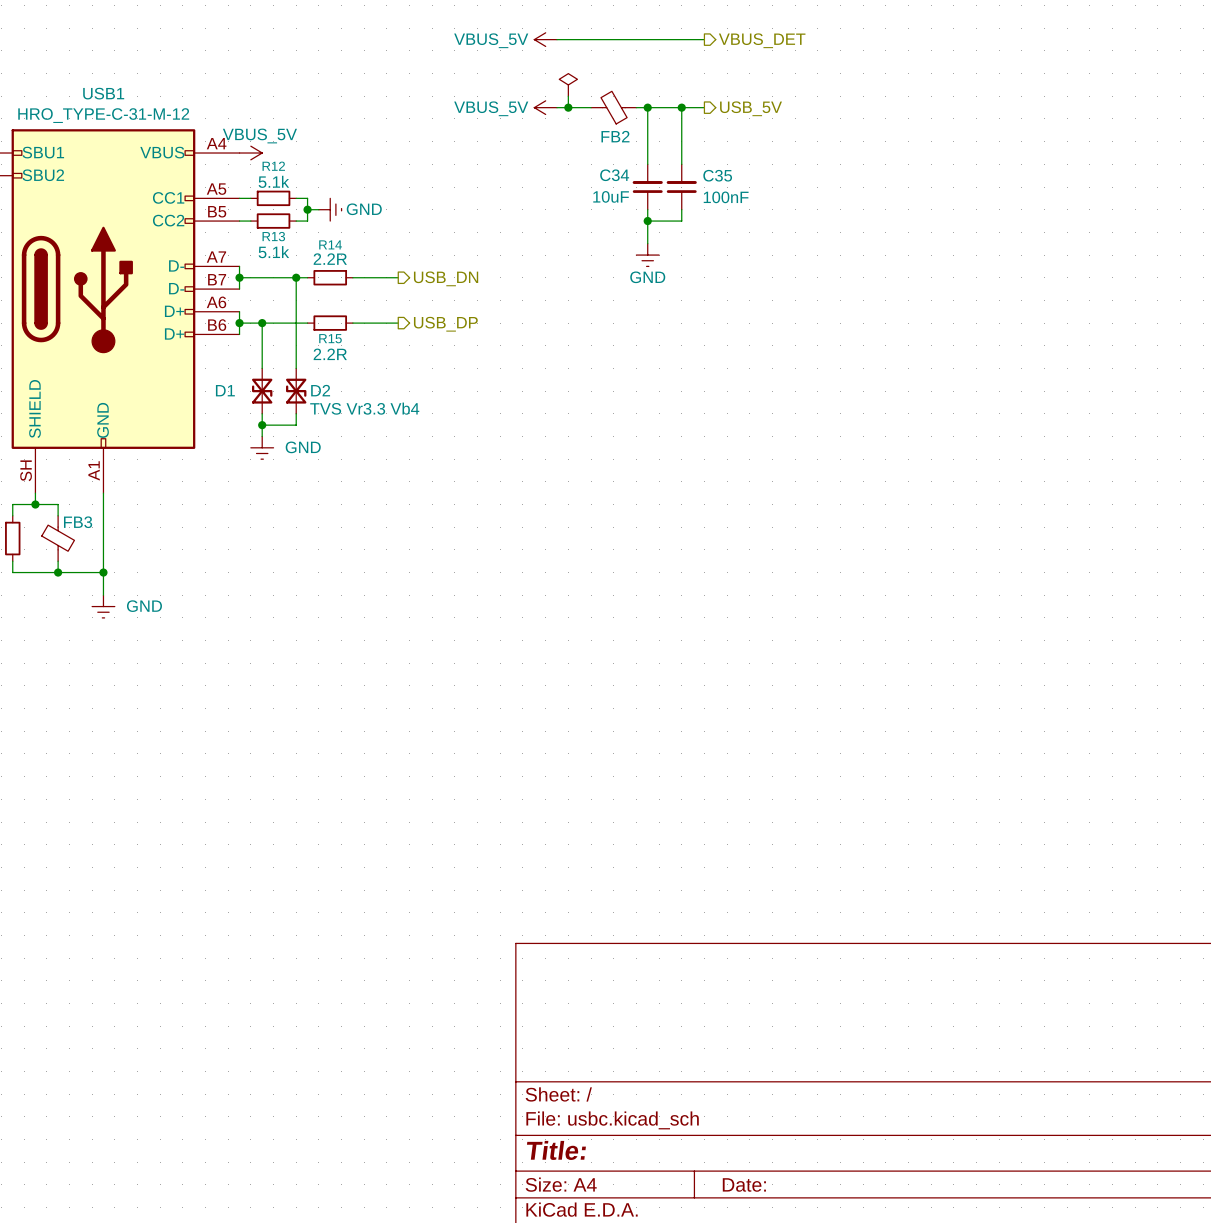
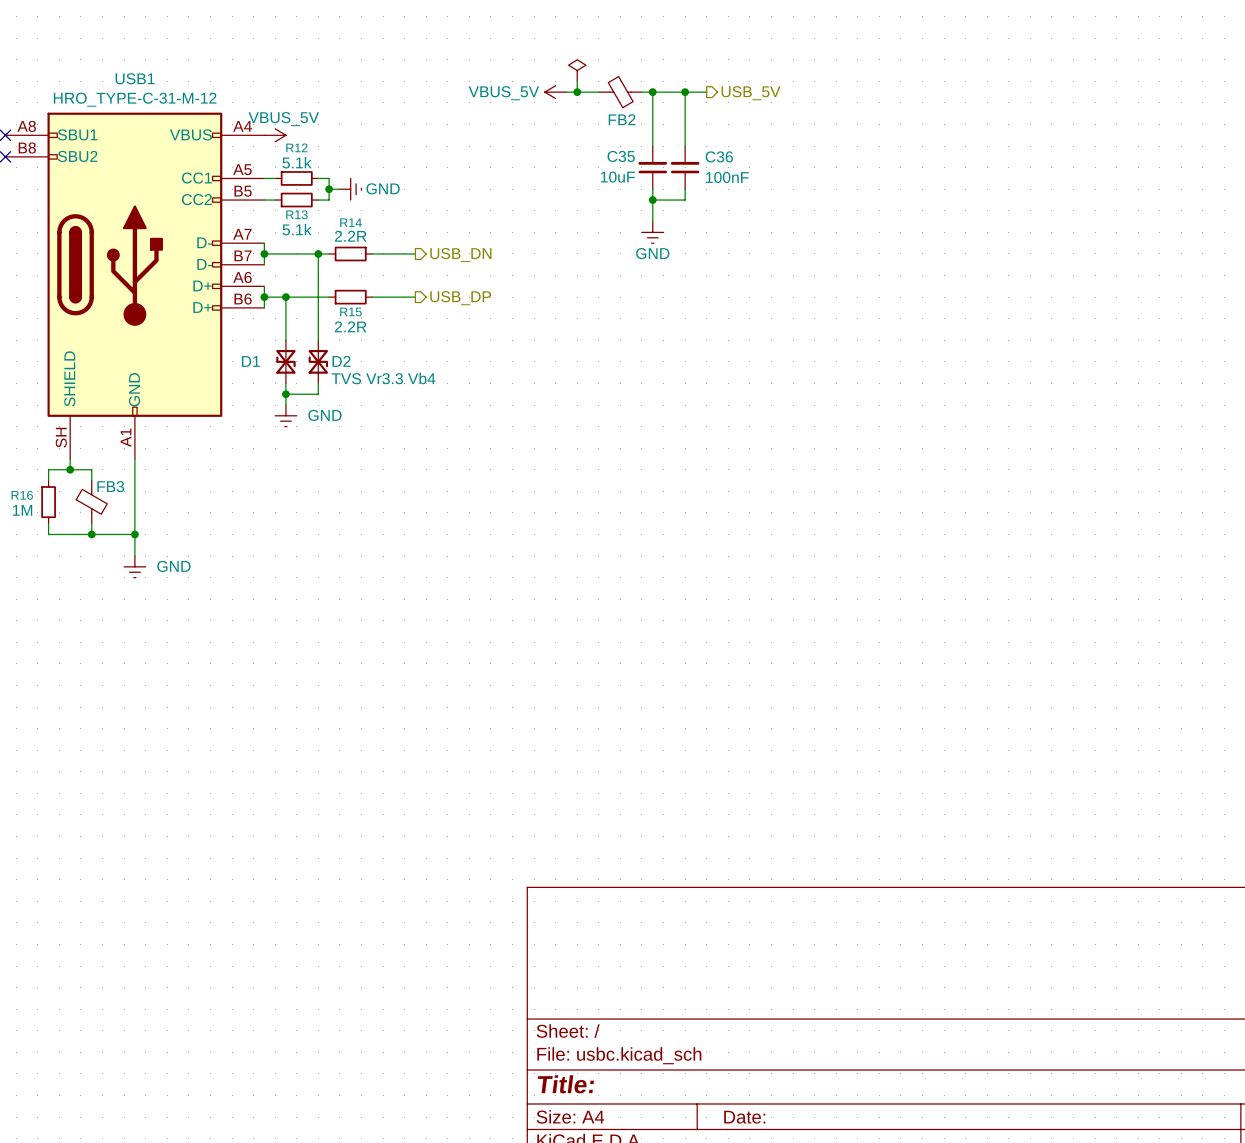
power symbol: VBUS_5V (545, 39) -> none
wire: (557, 39) (704, 39) -> none
hierarchical label: VBUS_DET (762, 40) -> none
C34 name: C34 (614, 175) -> C35 (621, 156)
C35 name: C35 (717, 175) -> C36 (719, 156)

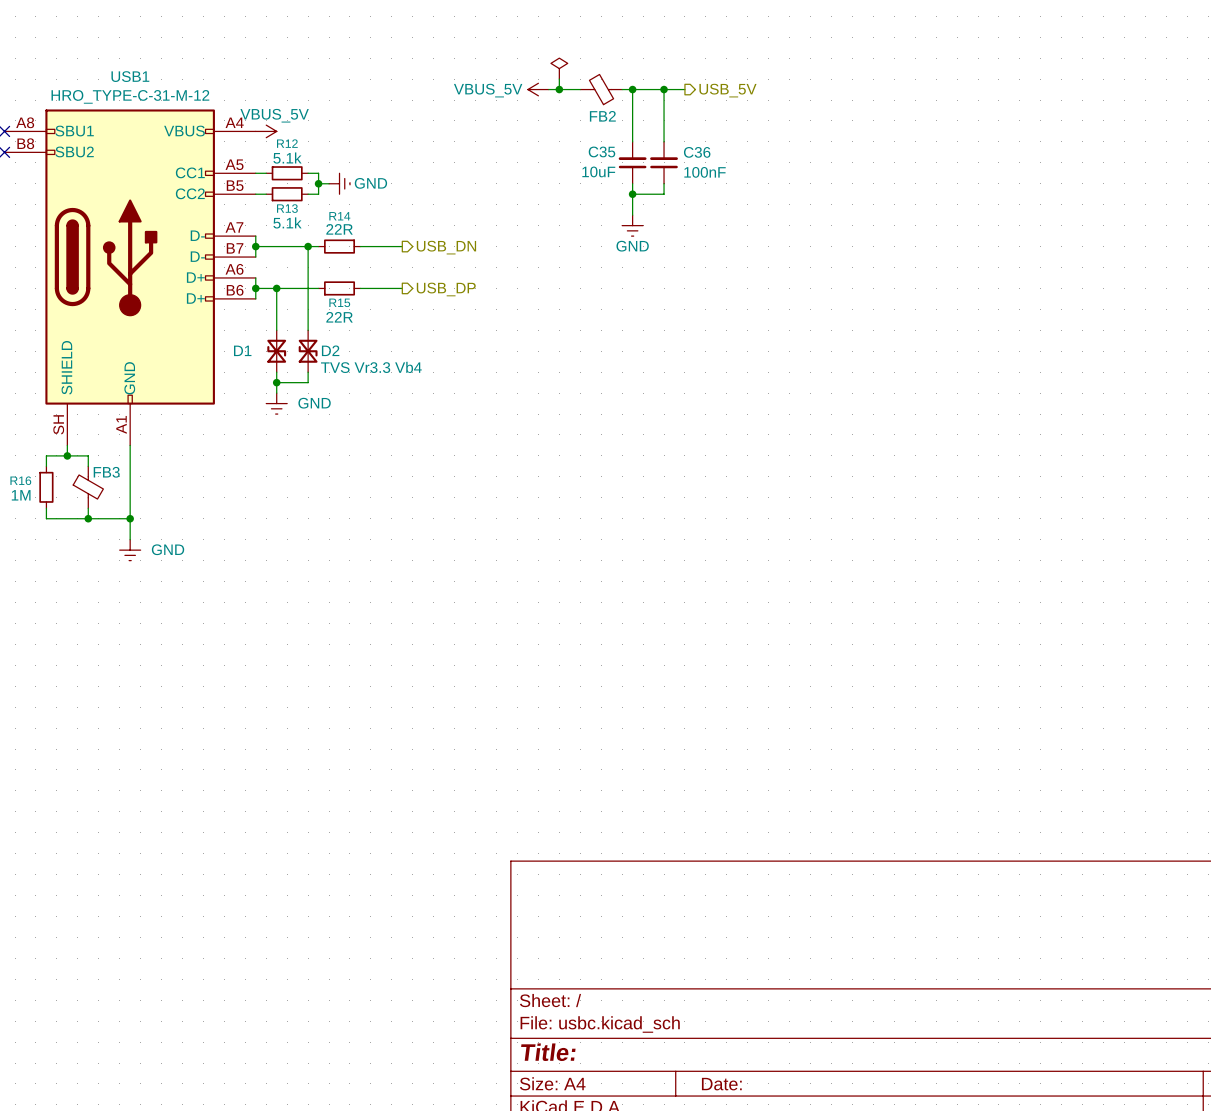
R14 value: 2.2R (350, 236) -> 22R (339, 229)
R15 value: 2.2R (350, 326) -> 22R (339, 317)

